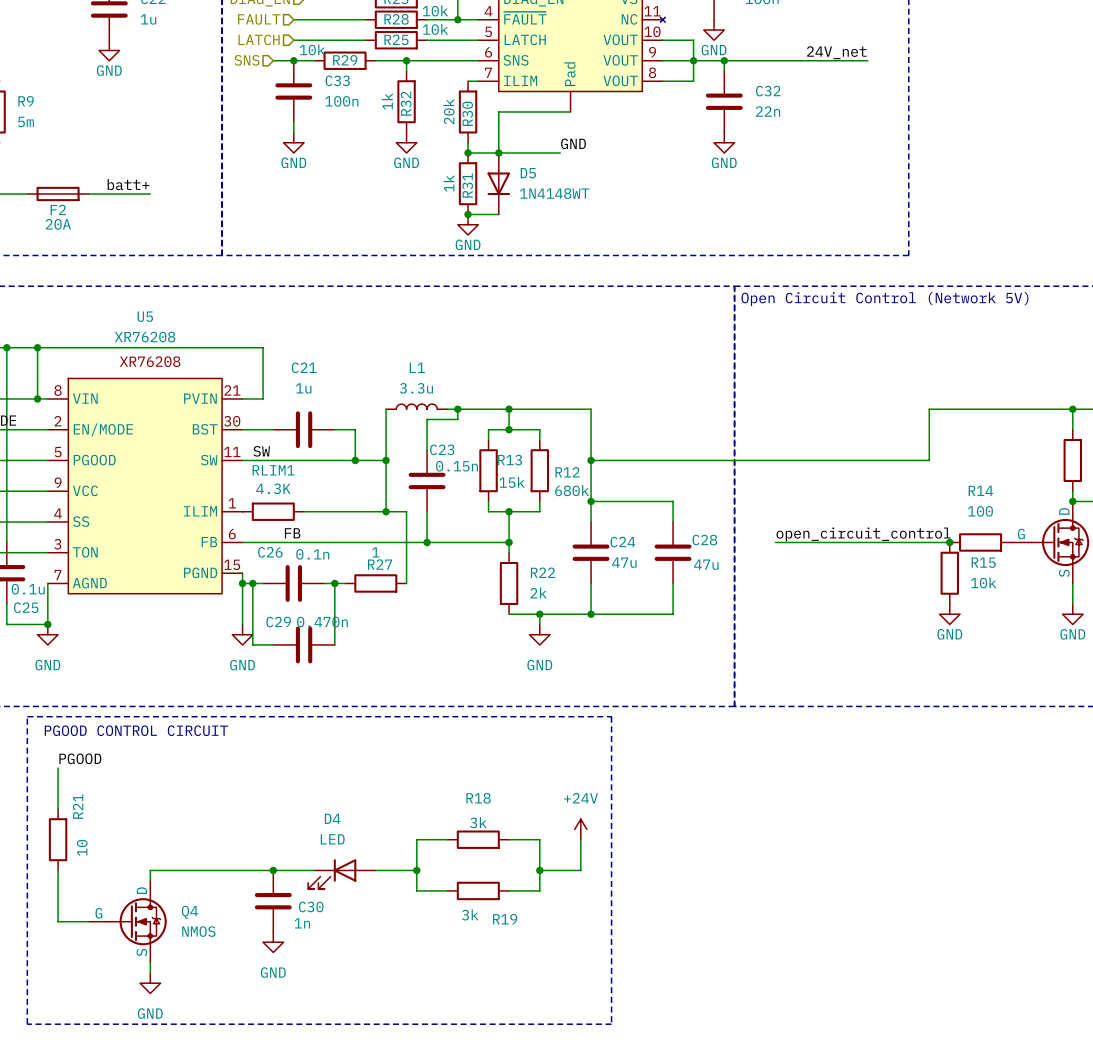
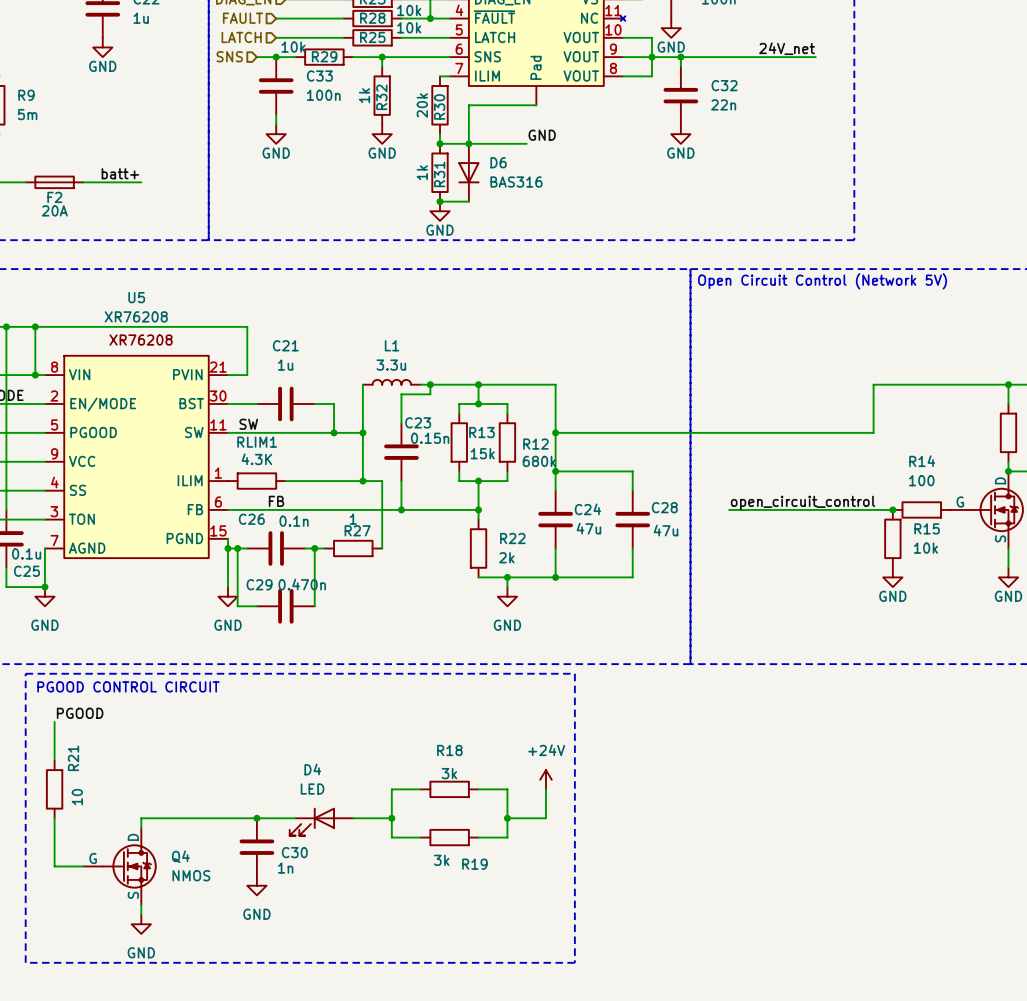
D5 name: D5 (528, 173) -> D6 (498, 162)
D5 value: 1N4148WT (554, 193) -> BAS316 (516, 182)

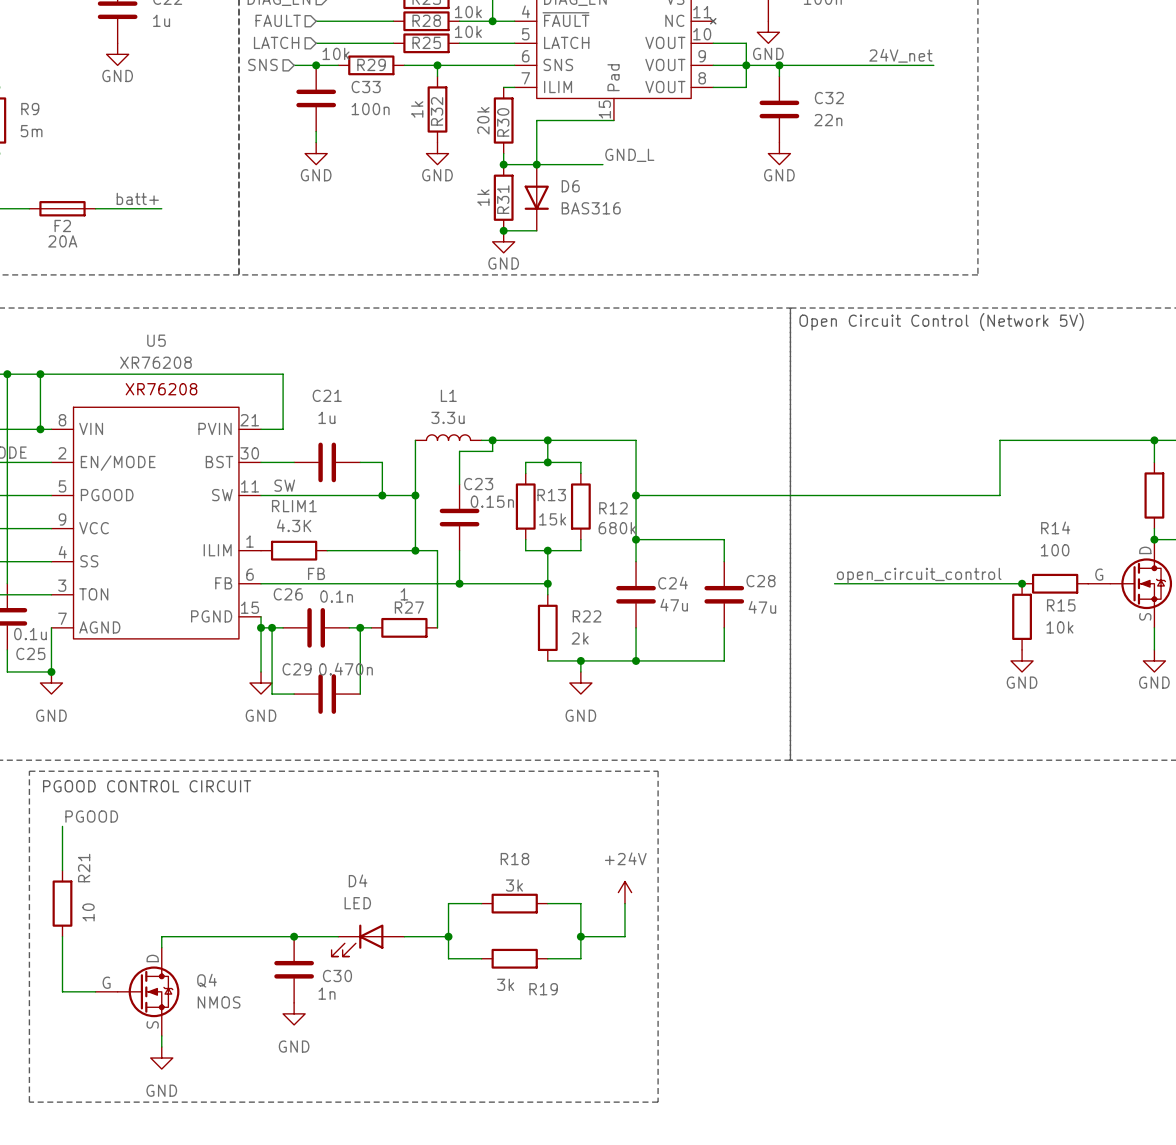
part pin number: none -> 15 (604, 109)
label: GND (542, 135) -> GND_L (629, 155)

